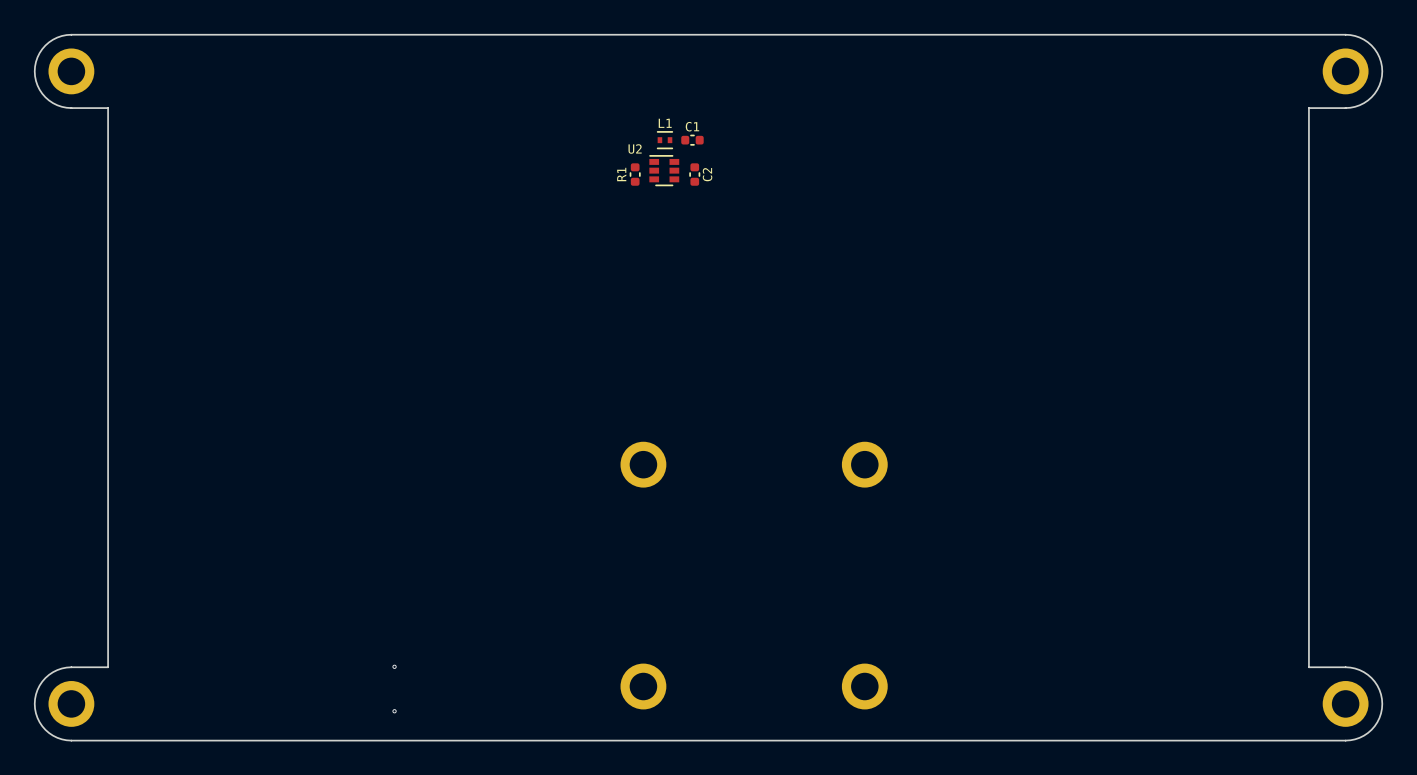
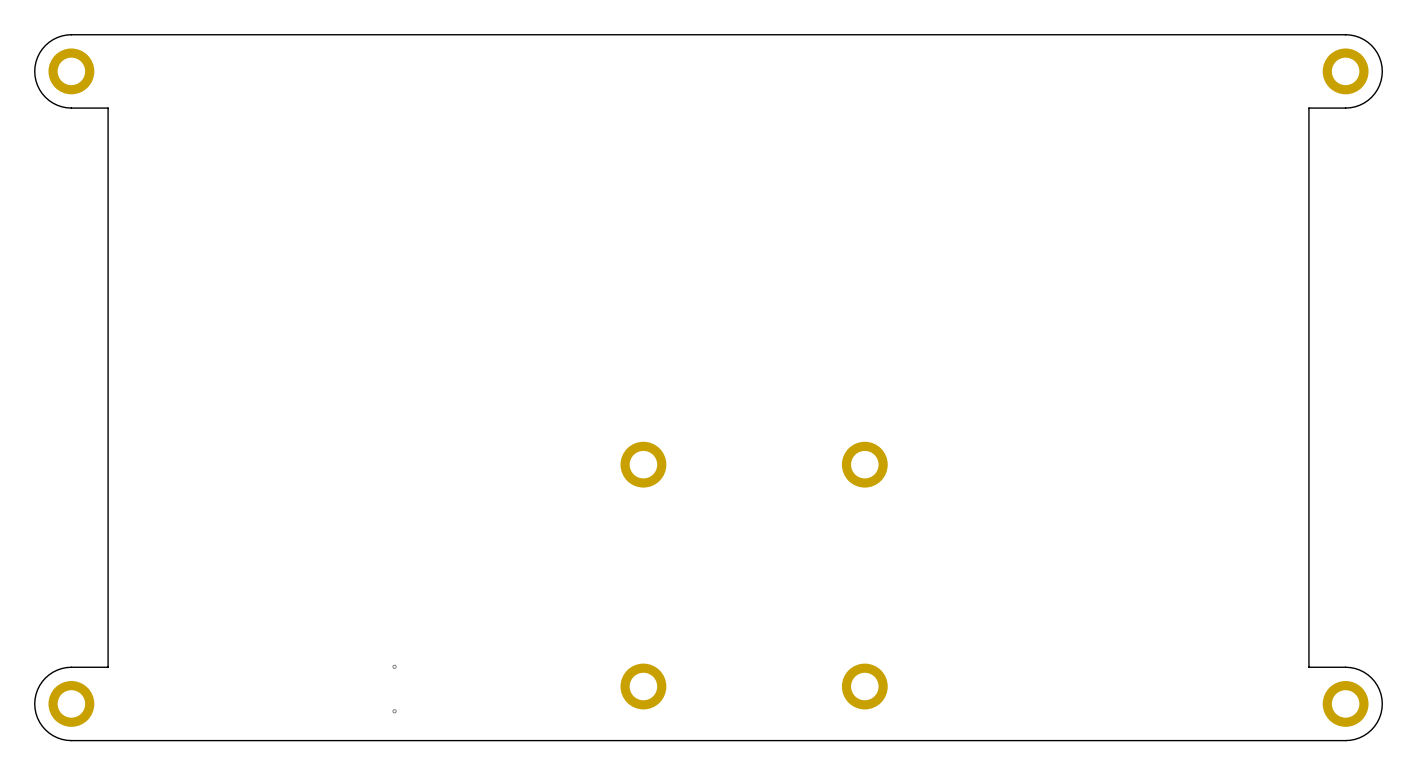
L1: (664, 140) -> none
C1: (692, 140) -> none
U2: (664, 170) -> none
R1: (635, 174) -> none
C2: (694, 174) -> none

